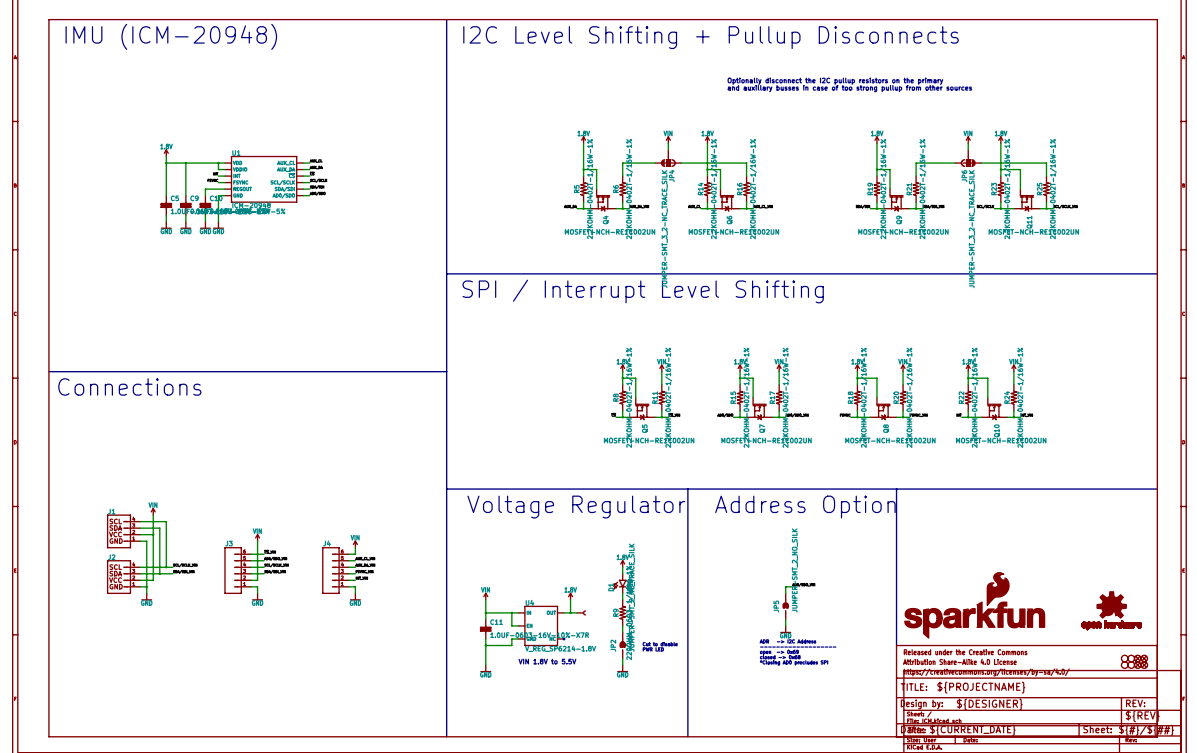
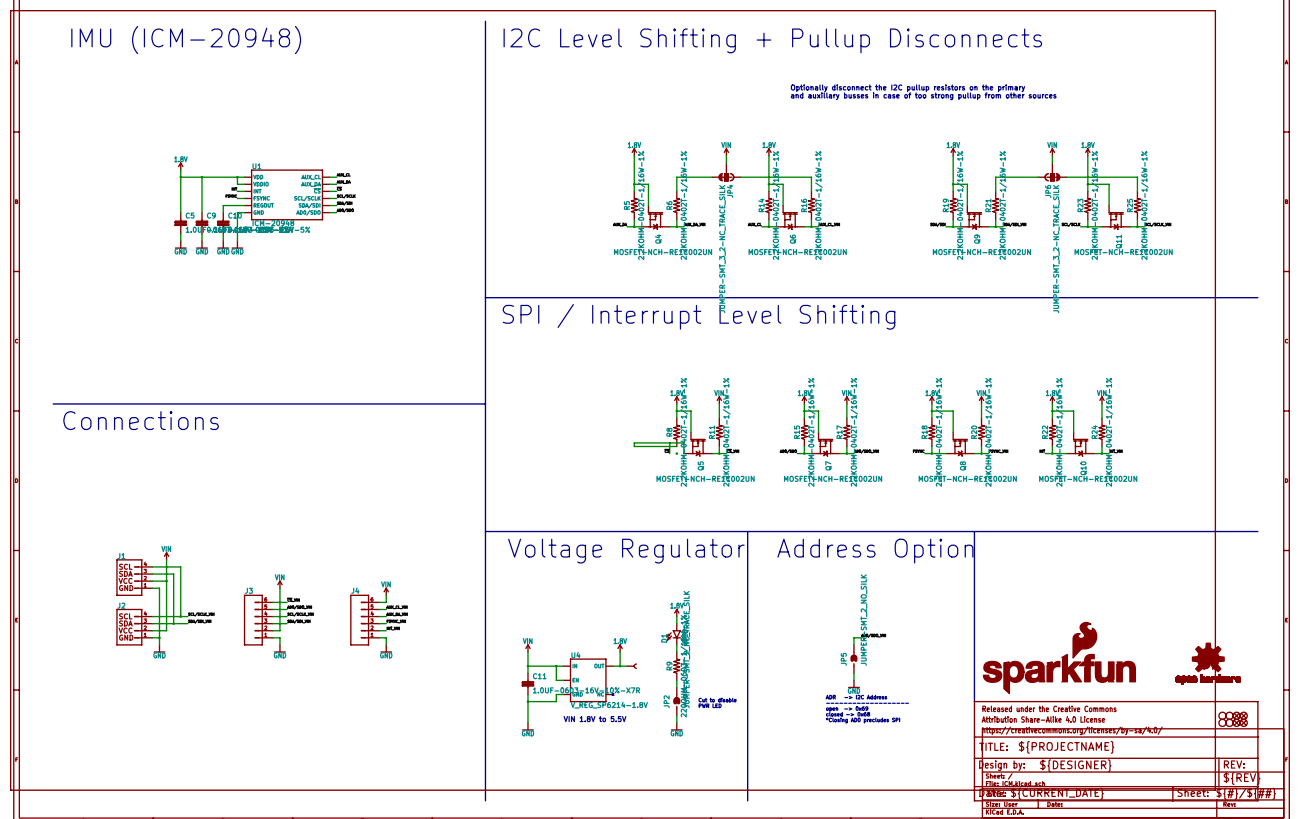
part position: (603, 378) -> (613, 400)
wire: (622, 410) (622, 417) -> (676, 446) (634, 446) (634, 442) (683, 442) (683, 453)
wire: (616, 417) (629, 417) -> (669, 453) (669, 442)

